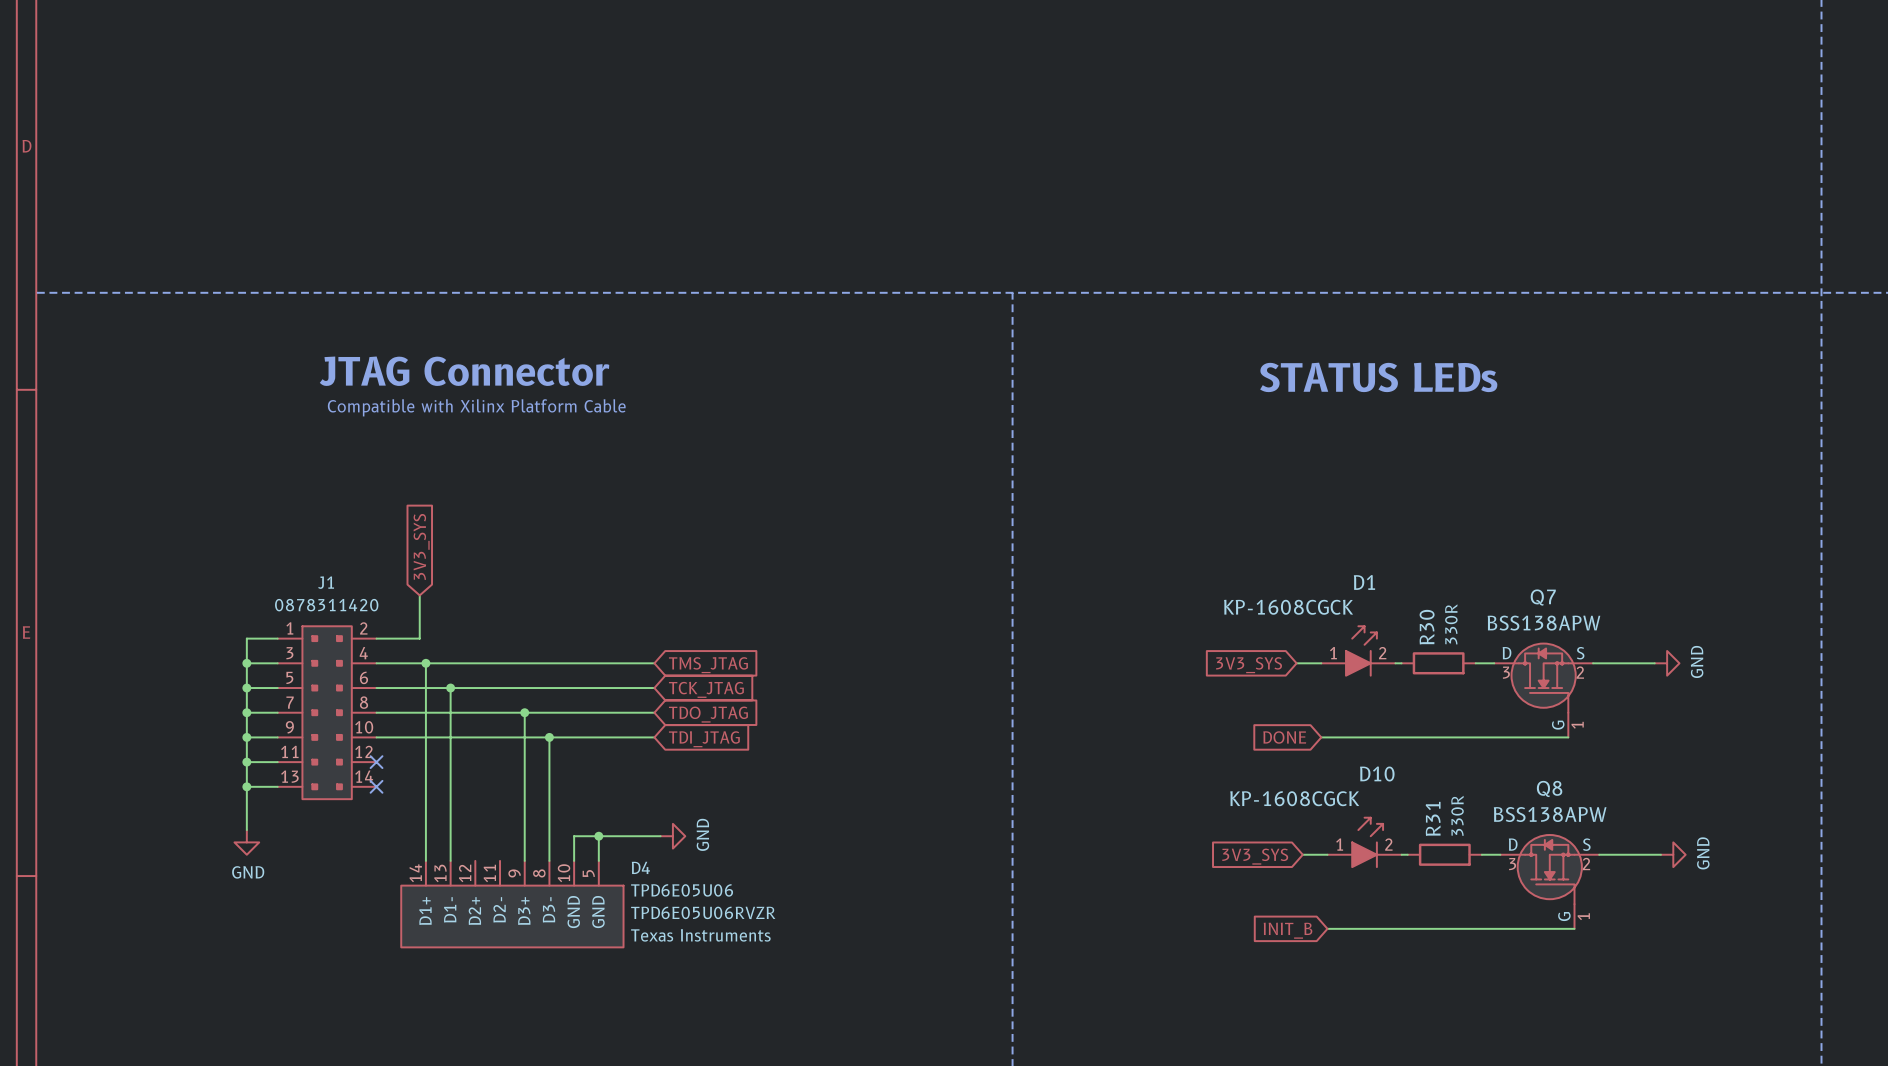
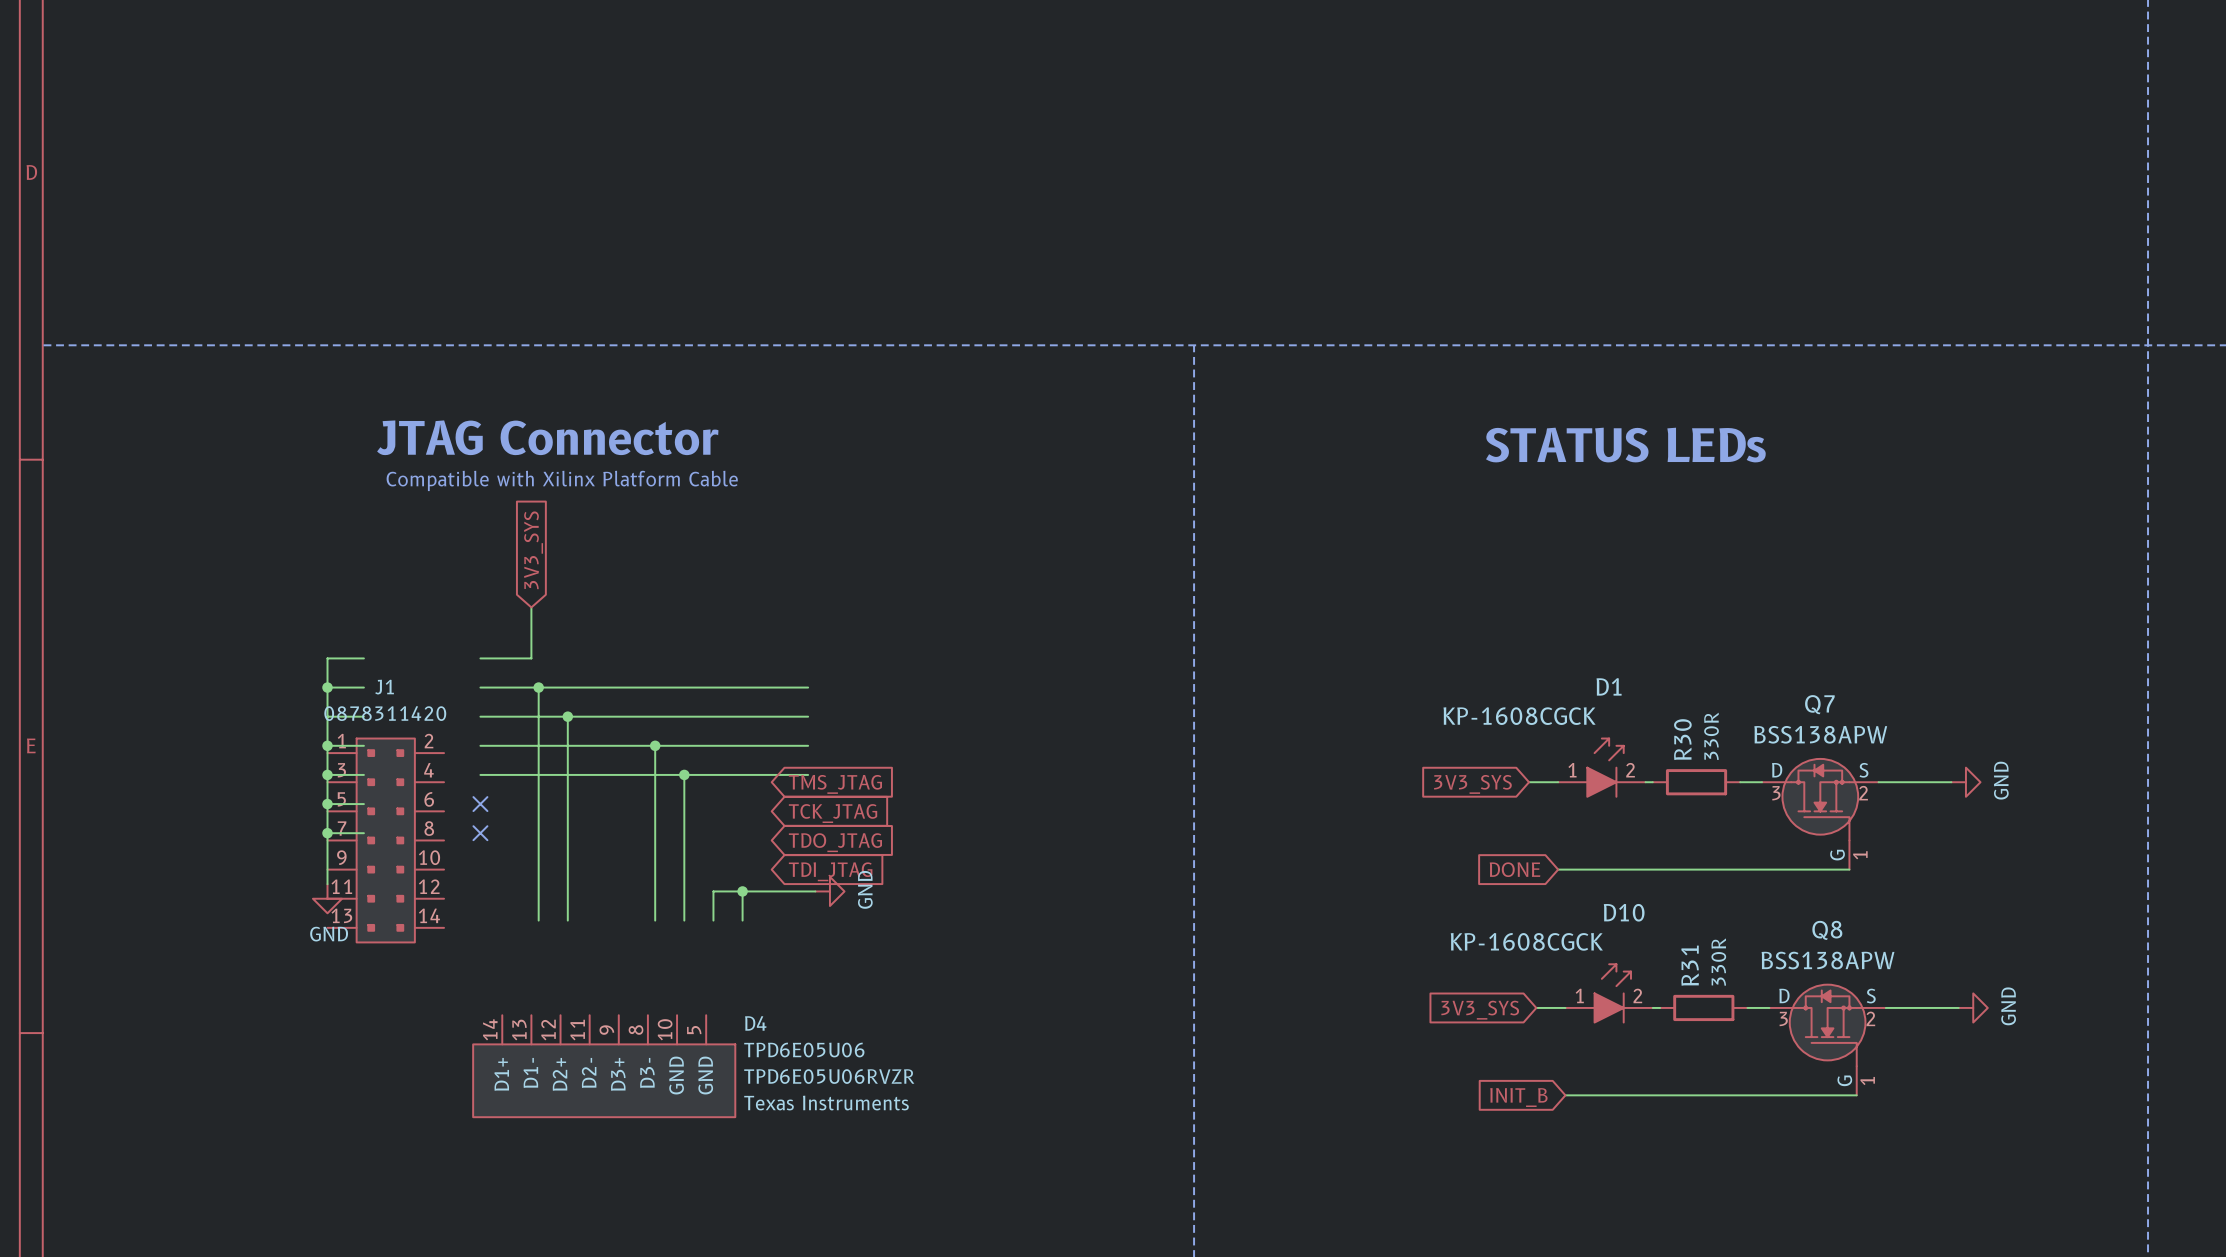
global label position: 3V3_SYS (421, 546) -> 3V3_SYS (533, 550)
junction: none -> (327, 687)
junction: none -> (538, 687)
wire: (419, 595) (419, 638) (376, 638) -> (531, 607) (531, 658) (480, 658)
junction: none -> (567, 716)
junction: none -> (327, 745)
junction: none -> (655, 745)
wire: (277, 638) (246, 638) (246, 830) -> (363, 658) (327, 658) (327, 884)
junction: none -> (327, 774)
junction: none -> (684, 774)
wire: (246, 663) (277, 663) -> (327, 687) (363, 687)
junction: (246, 663) -> none
wire: (376, 663) (654, 663) -> (480, 687) (808, 687)
wire: (425, 663) (425, 860) -> (538, 687) (538, 920)
junction: (425, 663) -> none
junction: none -> (327, 804)
no-connect mark: none -> (480, 804)
wire: (246, 688) (277, 688) -> (327, 716) (363, 716)
junction: (246, 688) -> none
wire: (376, 688) (654, 688) -> (480, 716) (808, 716)
wire: (450, 688) (450, 860) -> (567, 716) (567, 920)
junction: (450, 688) -> none
junction: none -> (327, 833)
no-connect mark: none -> (480, 833)
wire: (246, 712) (277, 712) -> (327, 745) (363, 745)
junction: (246, 712) -> none
wire: (376, 712) (654, 712) -> (480, 745) (808, 745)
wire: (524, 712) (524, 860) -> (655, 745) (655, 920)
junction: (524, 712) -> none
wire: (246, 737) (277, 737) -> (327, 774) (363, 774)
junction: (246, 737) -> none
wire: (376, 737) (654, 737) -> (480, 774) (808, 774)
wire: (549, 737) (549, 860) -> (684, 774) (684, 920)
junction: (549, 737) -> none
junction: none -> (742, 891)
wire: (246, 762) (277, 762) -> (327, 804) (363, 804)
junction: (246, 762) -> none
no-connect mark: (376, 762) -> none
wire: (246, 786) (277, 786) -> (327, 833) (363, 833)
junction: (246, 786) -> none
no-connect mark: (376, 786) -> none
wire: (598, 836) (598, 860) -> (742, 891) (742, 920)
junction: (598, 836) -> none
wire: (660, 836) (574, 836) (574, 860) -> (815, 891) (713, 891) (713, 920)
power symbol position: GND (672, 836) -> GND (829, 891)
power symbol position: GND (246, 842) -> GND (327, 898)

